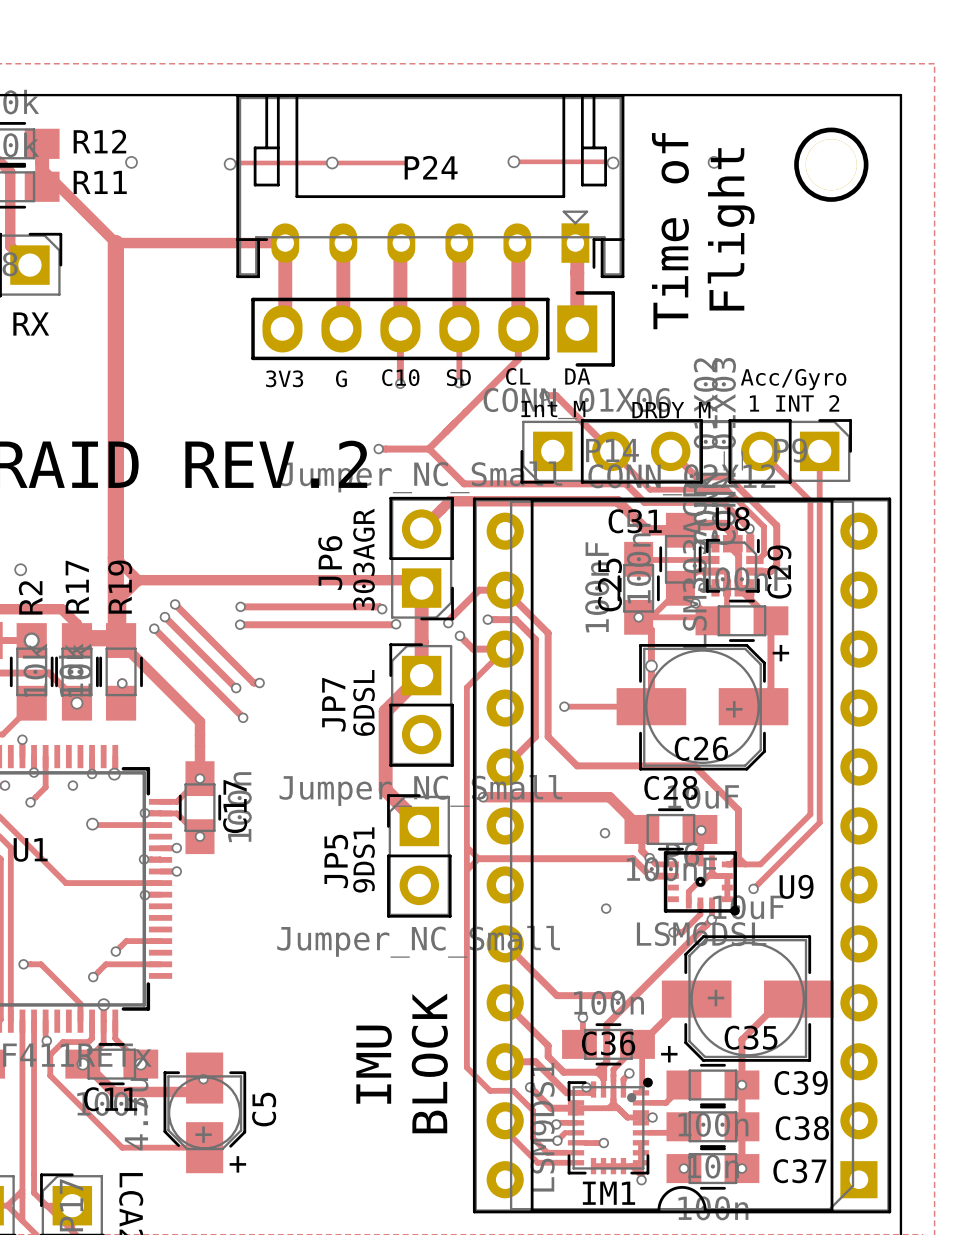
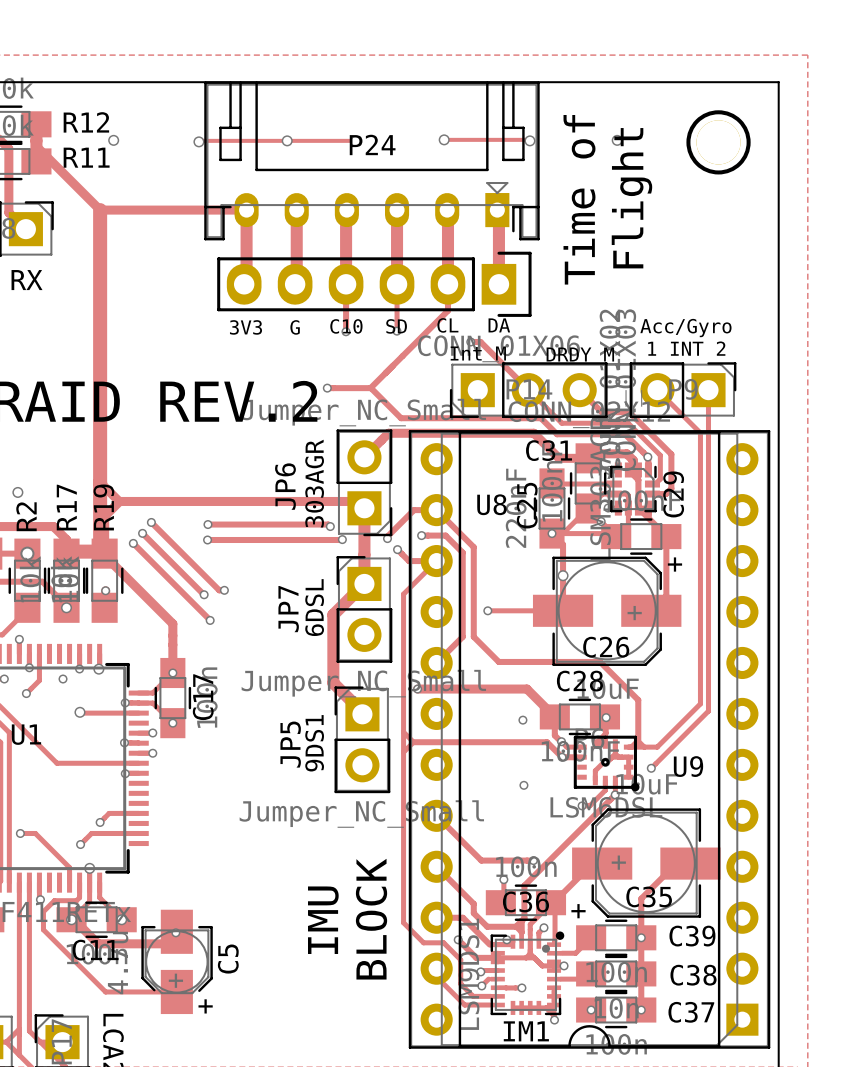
U8 name position: U8 (732, 518) -> U8 (491, 504)
C25 value: 100nF (597, 587) -> 220nF (516, 508)

